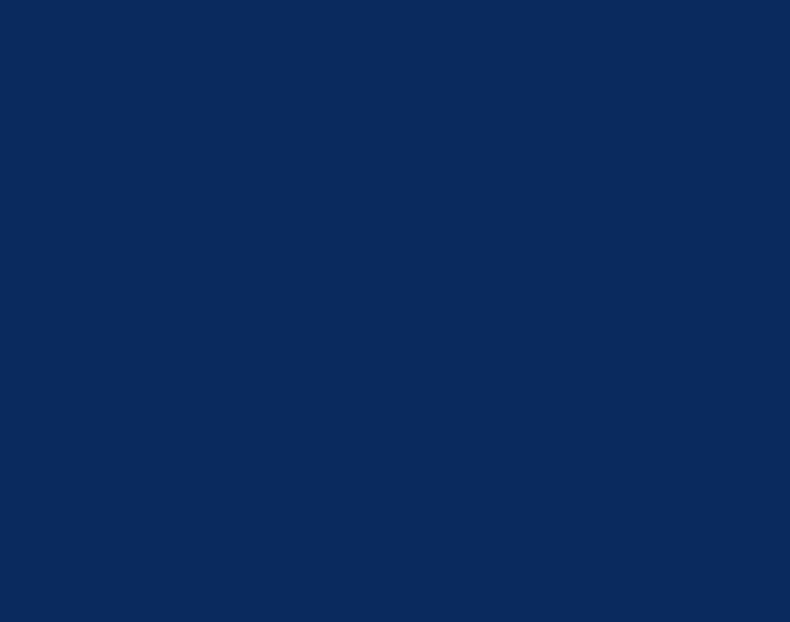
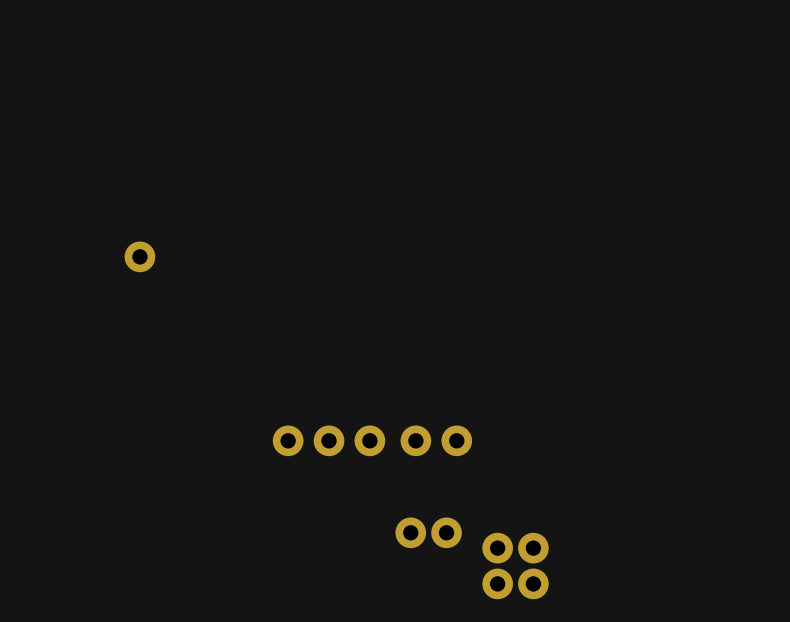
via: none -> (139, 256)
via: none -> (288, 440)
via: none -> (329, 440)
via: none -> (369, 440)
via: none -> (415, 440)
via: none -> (456, 440)
via: none -> (410, 532)
via: none -> (446, 532)
via: none -> (497, 548)
via: none -> (533, 548)
via: none -> (497, 583)
via: none -> (533, 583)

